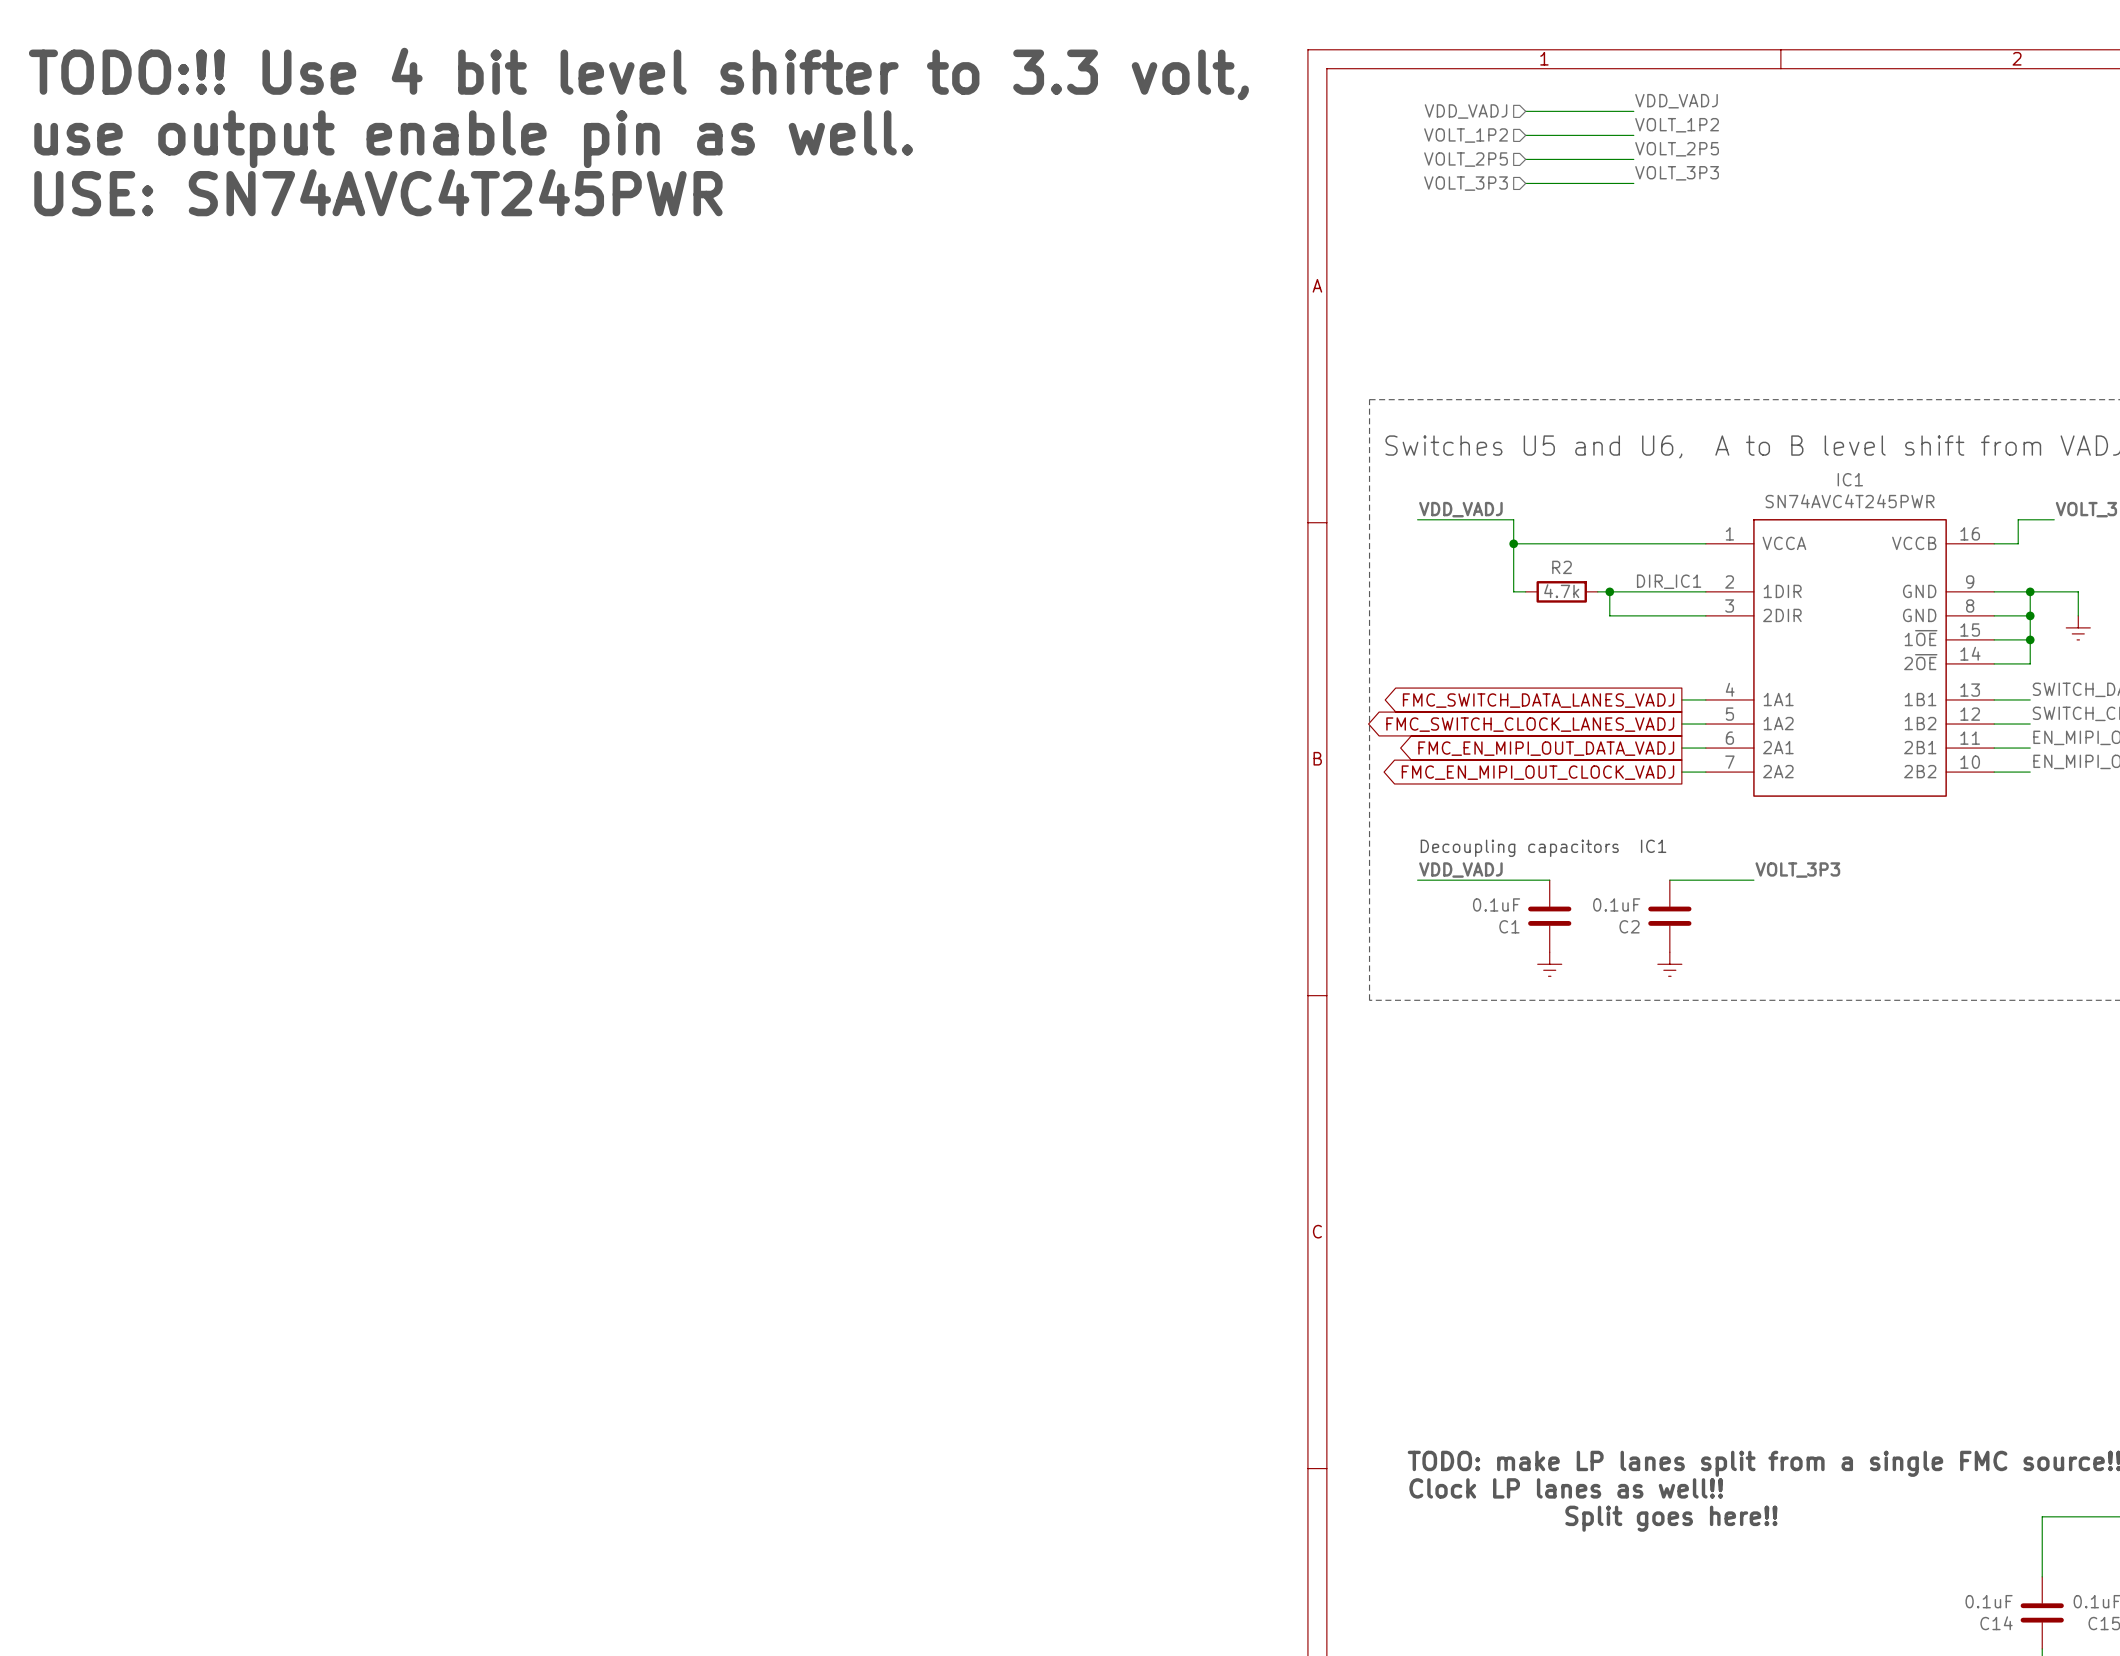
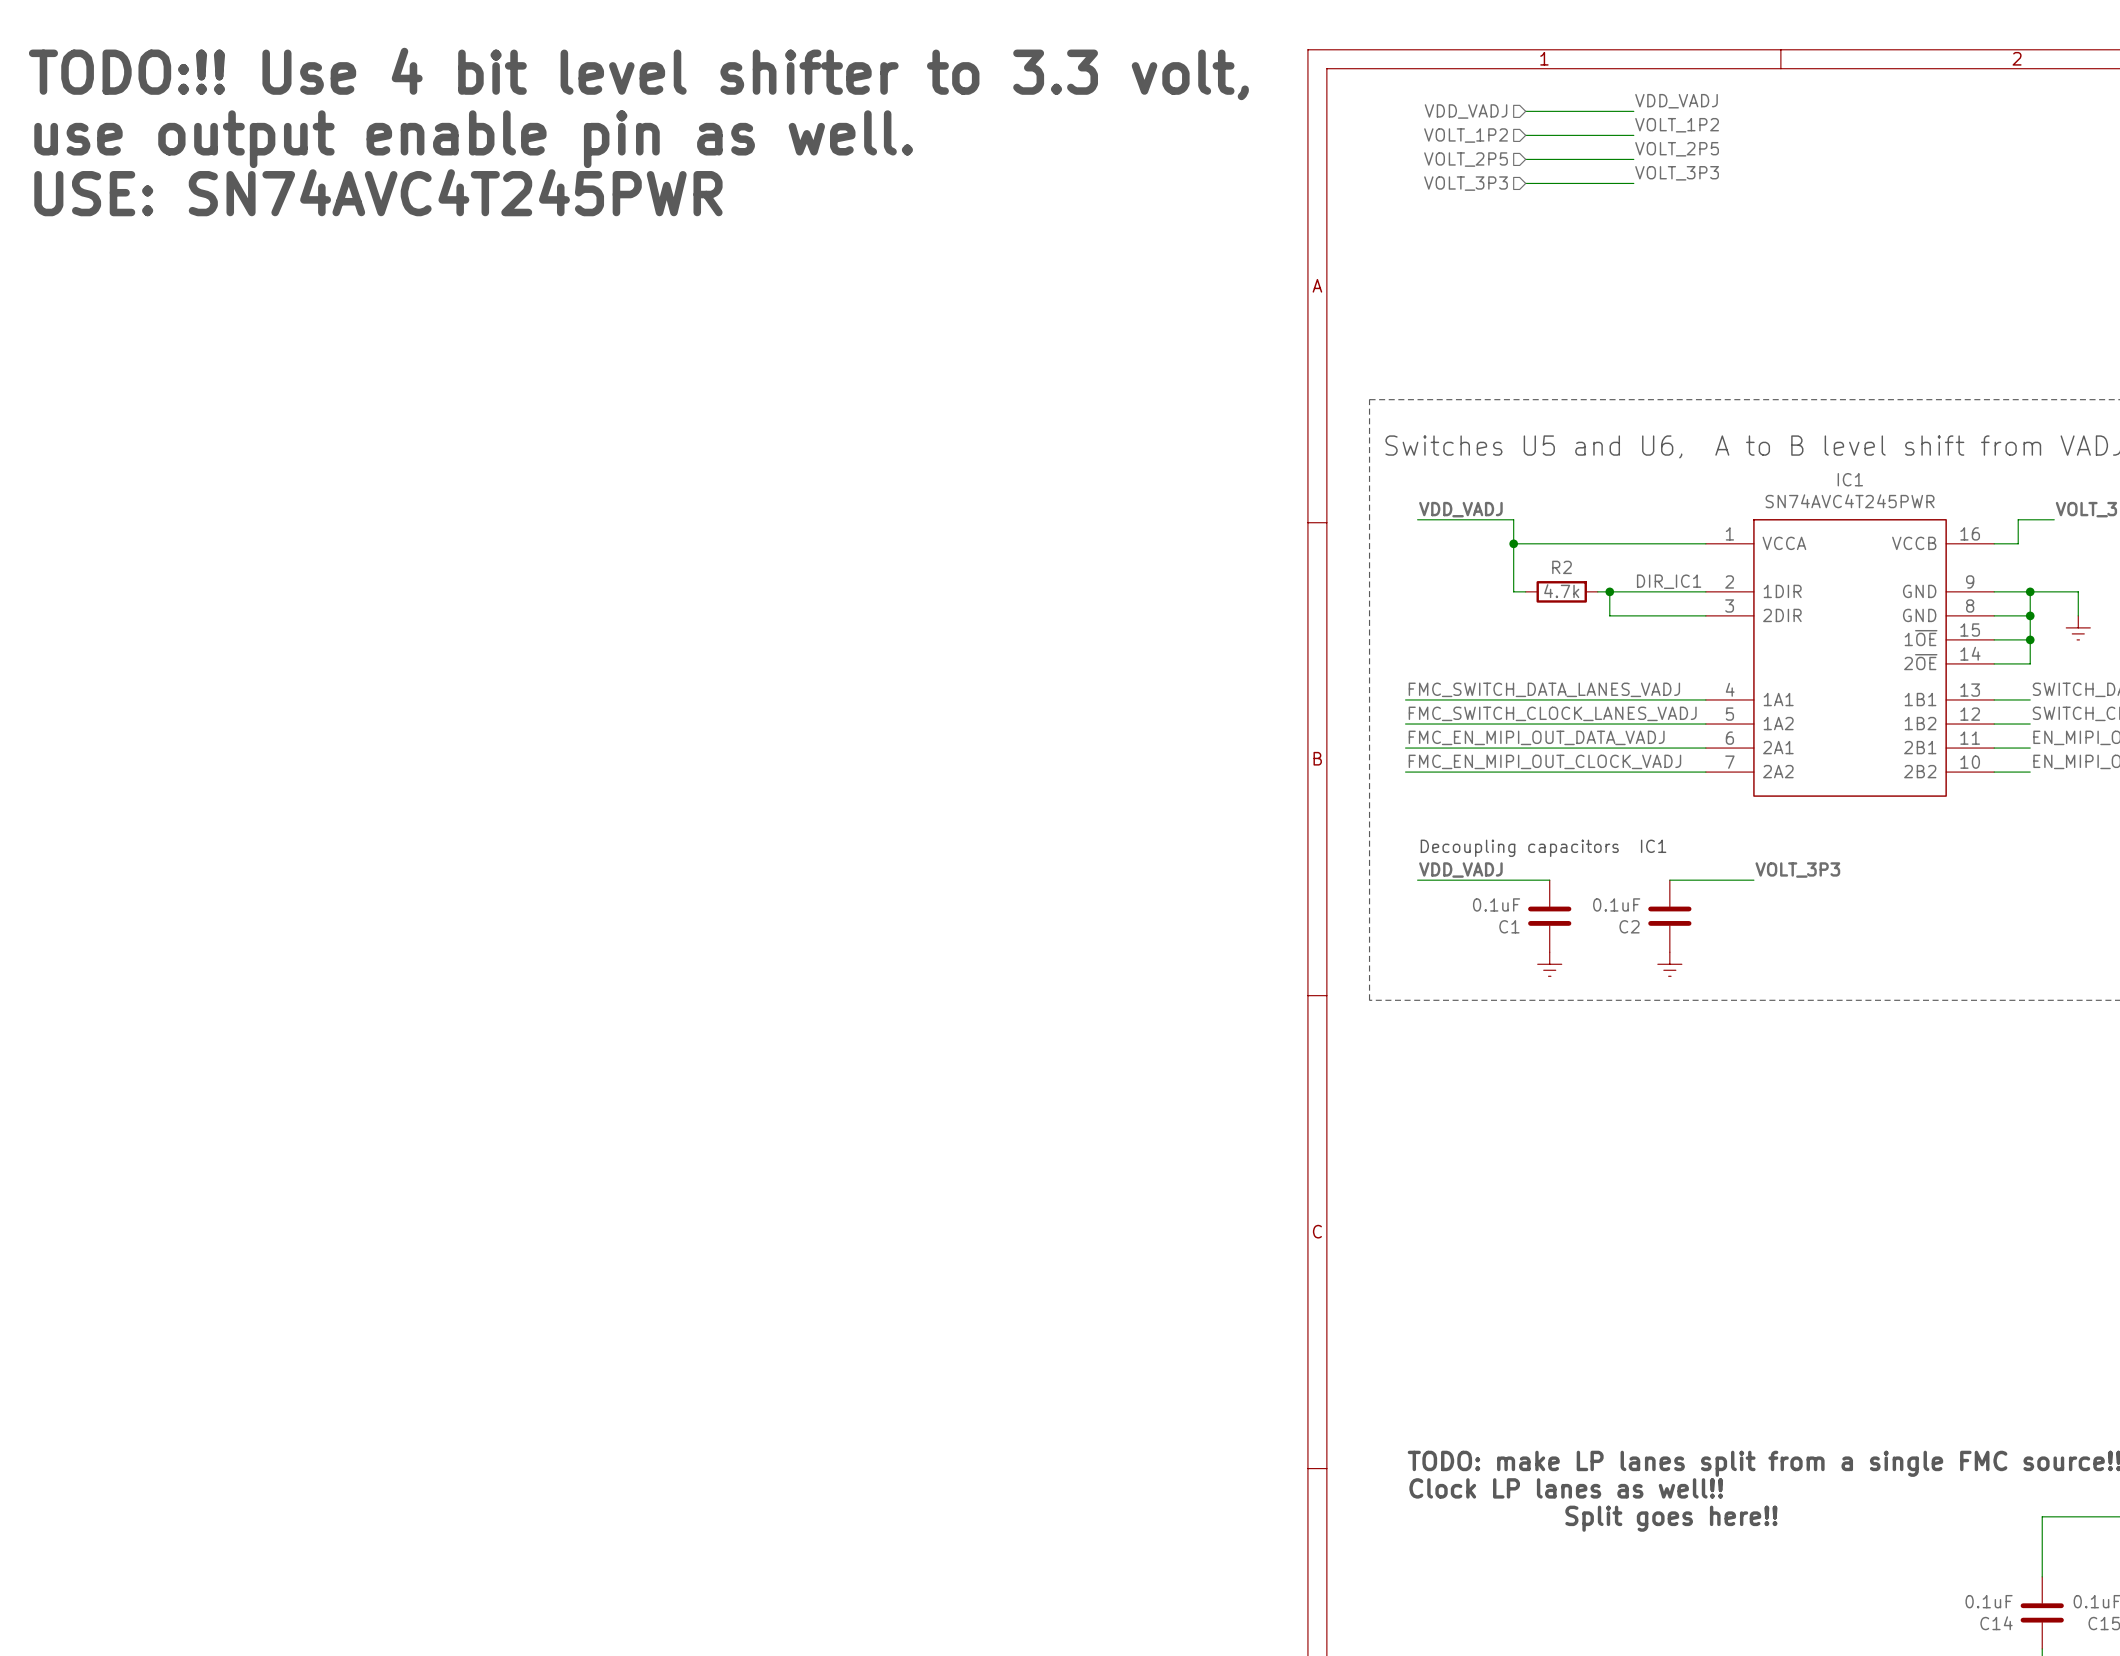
label: none -> FMC_SWITCH_DATA_LANES_VADJ (1544, 689)
wire: none -> (1405, 699) (1681, 699)
global label: FMC_SWITCH_DATA_LANES_VADJ (1538, 700) -> none
label: none -> FMC_SWITCH_CLOCK_LANES_VADJ (1552, 713)
wire: none -> (1405, 724) (1681, 724)
global label: FMC_SWITCH_CLOCK_LANES_VADJ (1530, 724) -> none
label: none -> FMC_EN_MIPI_OUT_DATA_VADJ (1536, 737)
wire: none -> (1405, 748) (1681, 748)
global label: FMC_EN_MIPI_OUT_DATA_VADJ (1546, 748) -> none
label: none -> FMC_EN_MIPI_OUT_CLOCK_VADJ (1544, 761)
wire: none -> (1405, 772) (1681, 772)
global label: FMC_EN_MIPI_OUT_CLOCK_VADJ (1537, 772) -> none

